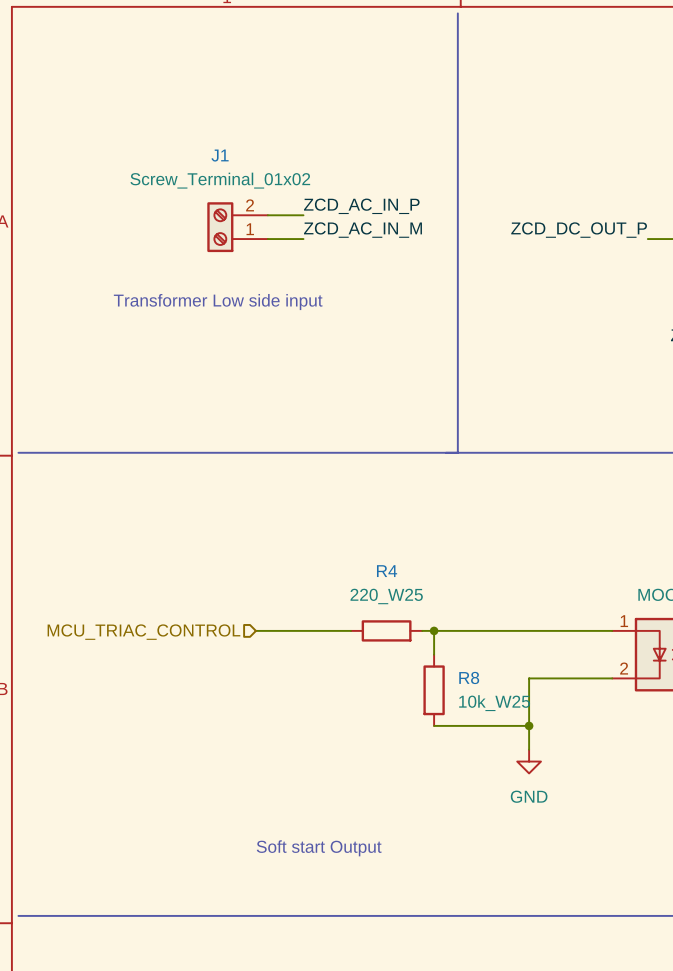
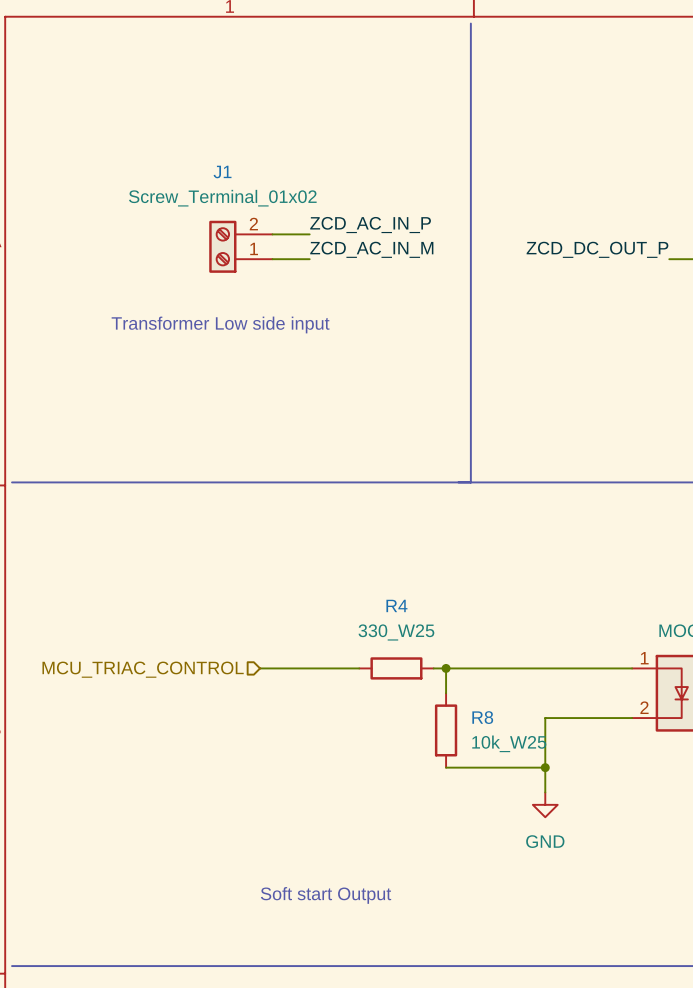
R4 value: 220_W25 (386, 596) -> 330_W25 (396, 632)

